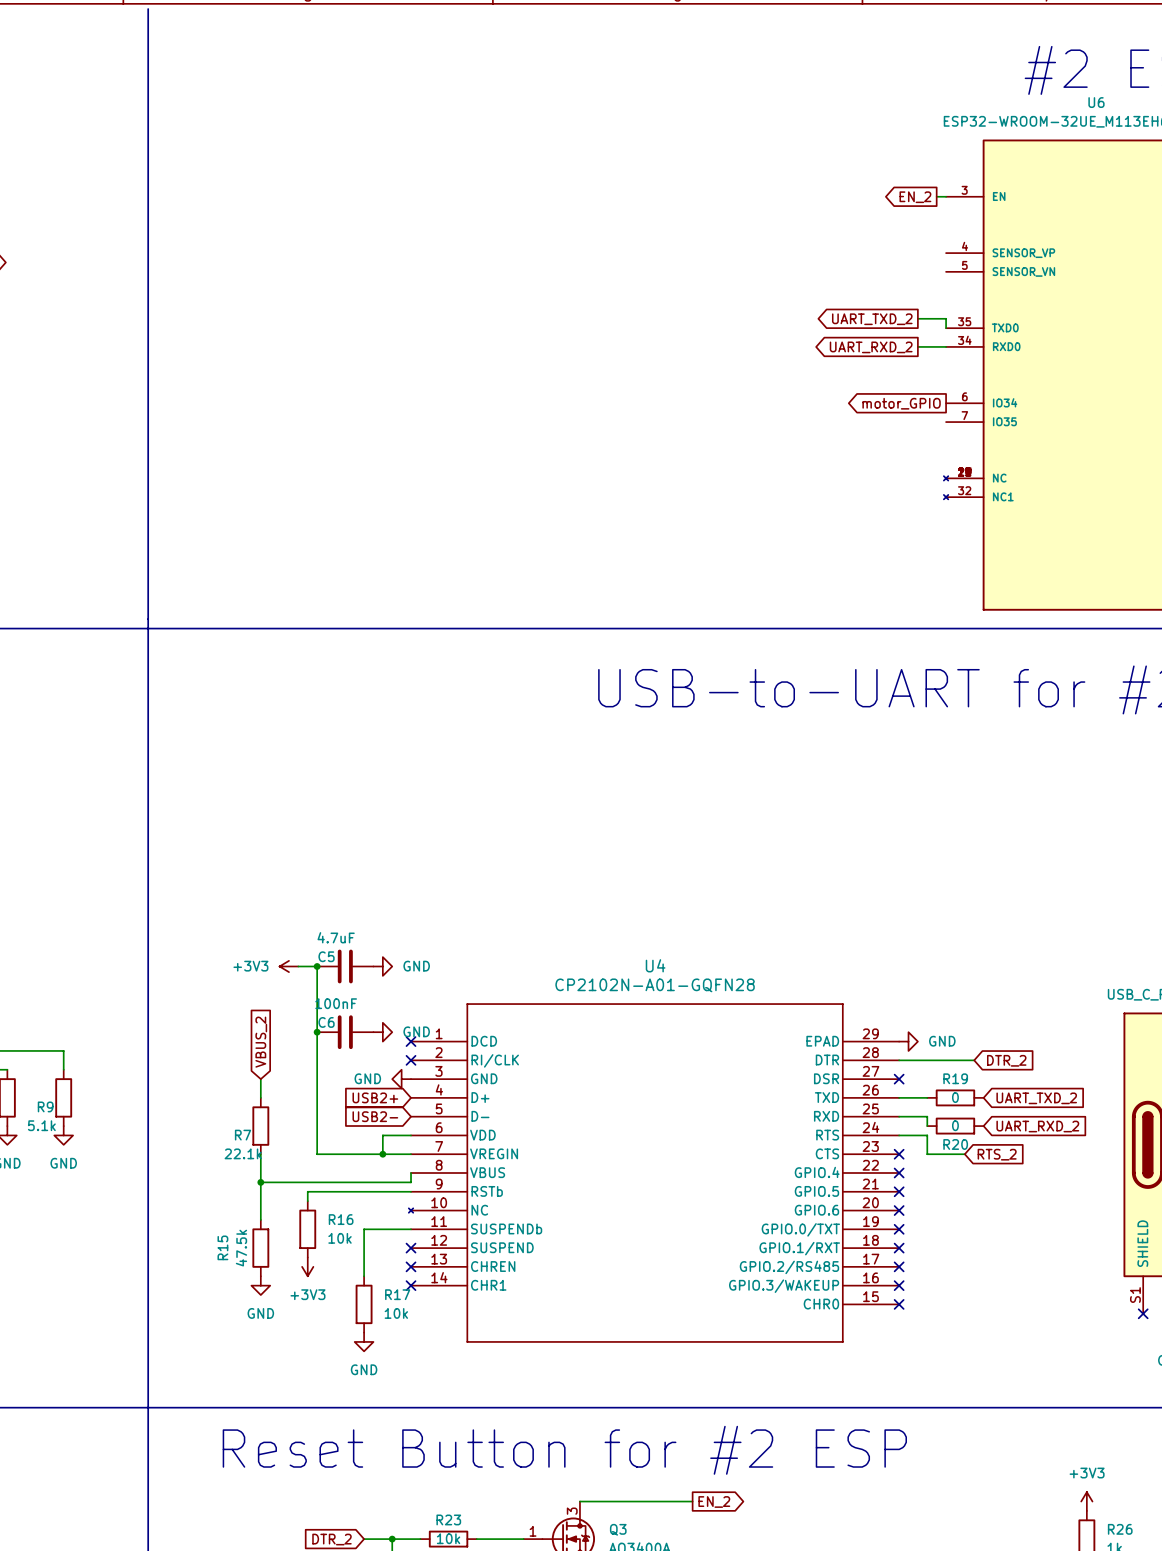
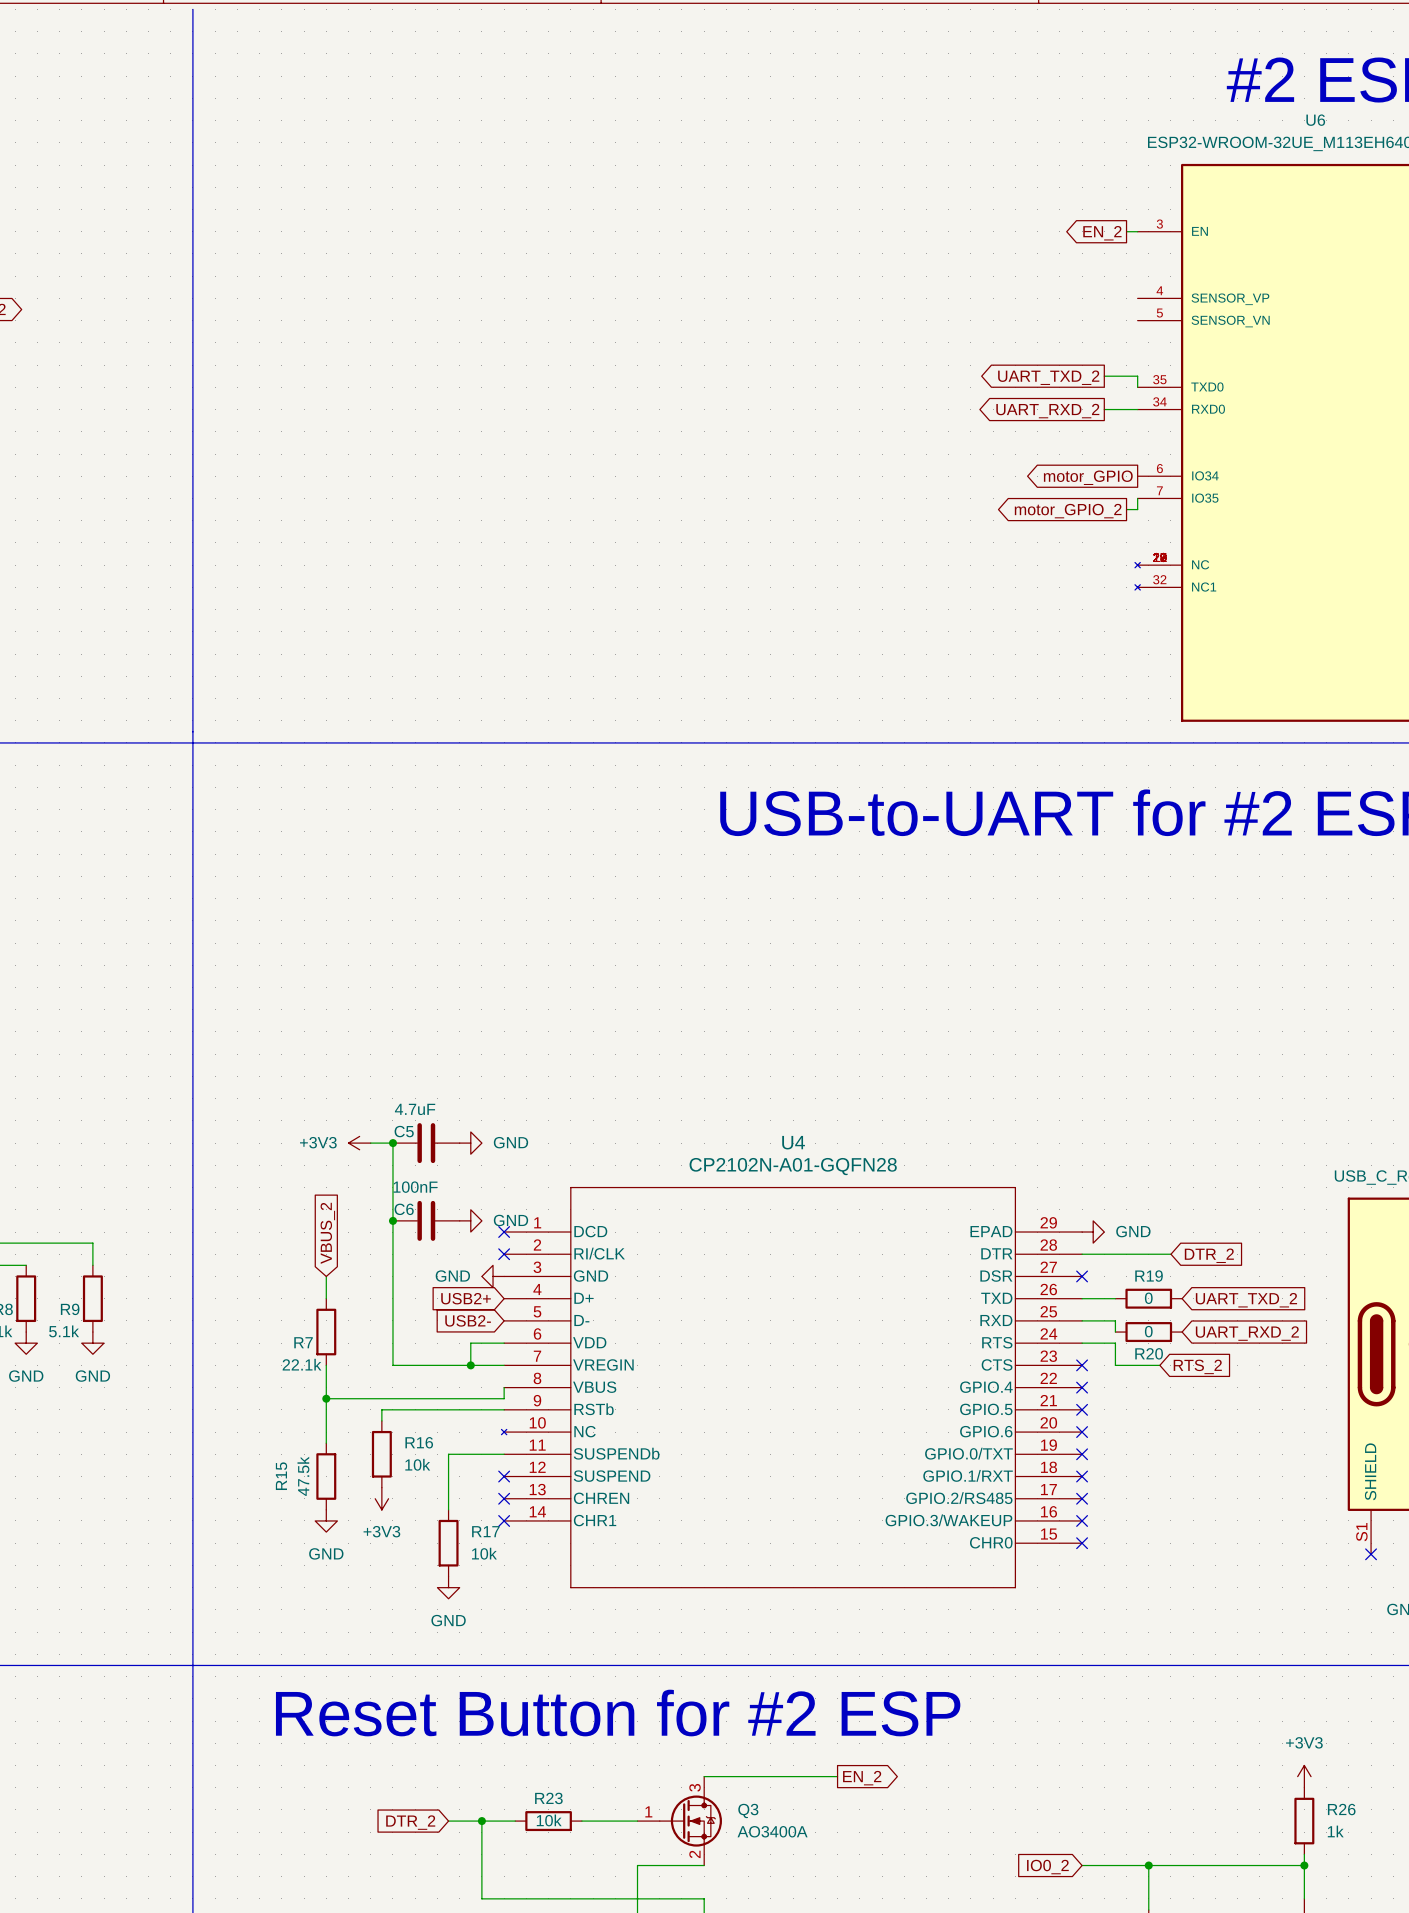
wire: none -> (1137, 498) (1137, 509) (1126, 509)
global label: none -> motor_GPIO_2 (1068, 511)

